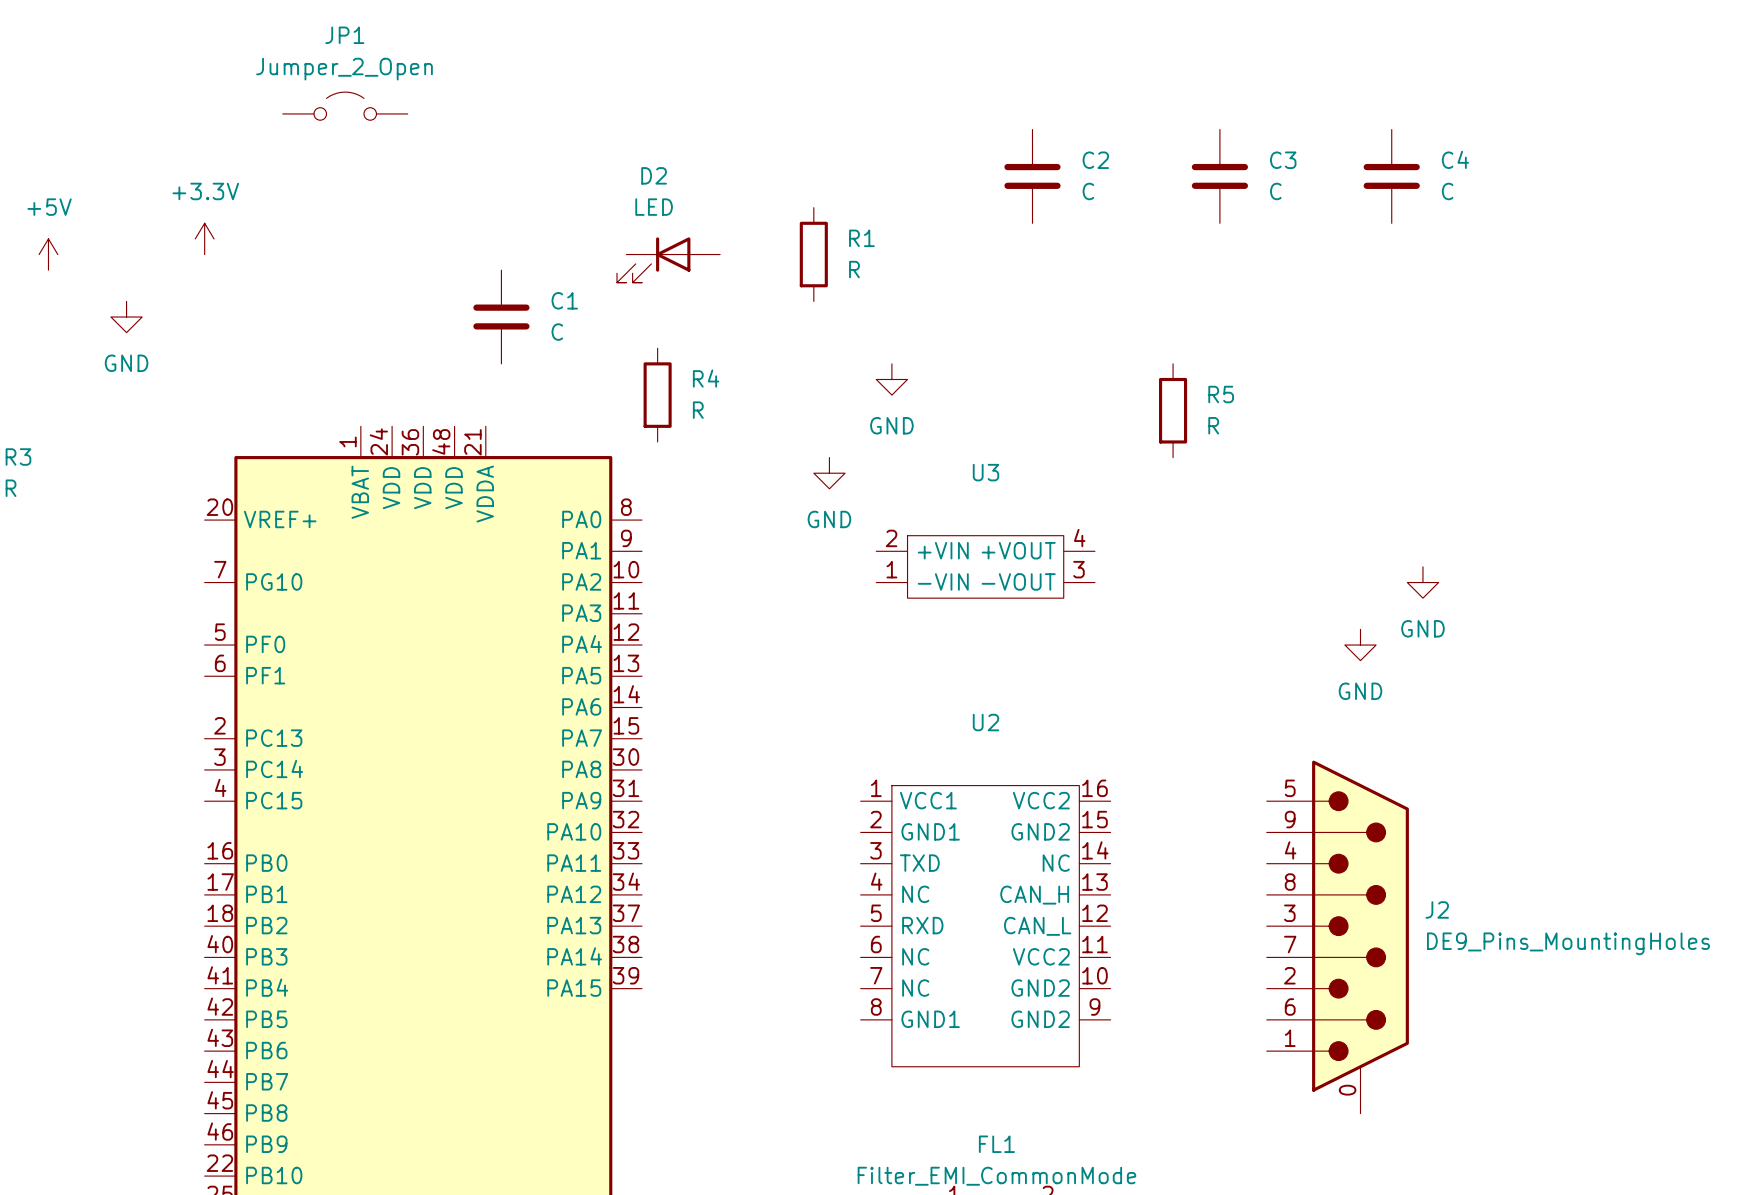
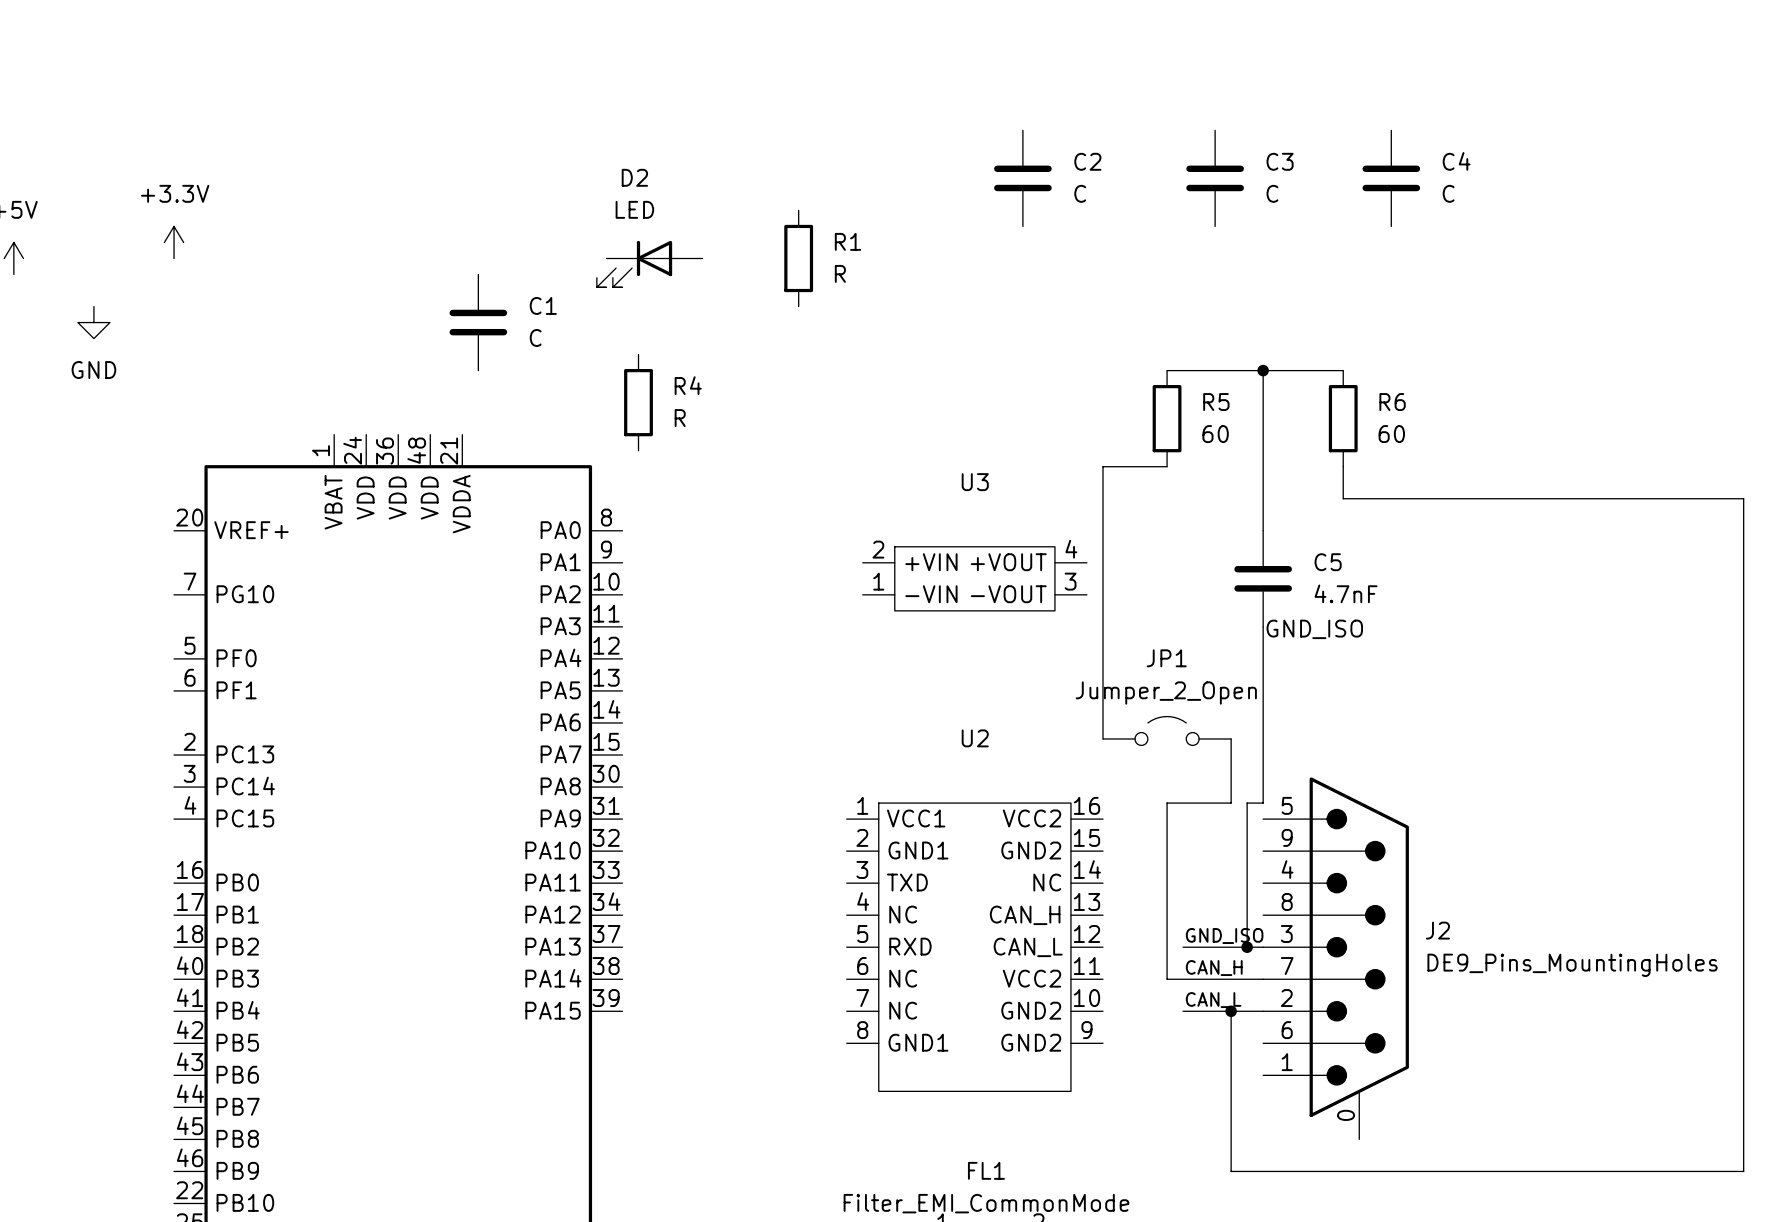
JP1 position: (345, 106) -> (1167, 730)
wire: none -> (1167, 370) (1343, 370)
wire: none -> (1263, 370) (1263, 530)
junction: none -> (1263, 370)
power symbol: GND (891, 379) -> none
R6: none -> 60 (1343, 418)
R5 value: R (1213, 425) -> 60 (1215, 434)
wire: none -> (1167, 466) (1102, 466) (1102, 738)
wire: none -> (1343, 466) (1343, 498) (1743, 498) (1743, 1171) (1231, 1171) (1231, 1011)
power symbol: GND (829, 473) -> none
C5: none -> 4.7nF (1263, 578)
power symbol: GND (1422, 582) -> none
wire: none -> (1263, 626) (1263, 803) (1247, 803) (1247, 947)
label: none -> GND_ISO (1314, 629)
power symbol: GND (1360, 645) -> none
wire: none -> (1231, 738) (1231, 803) (1167, 803) (1167, 979) (1263, 979)
label: none -> GND_ISO (1224, 936)
wire: none -> (1183, 947) (1263, 947)
junction: none -> (1247, 947)
label: none -> CAN_H (1214, 968)
label: none -> CAN_L (1213, 1000)
wire: none -> (1183, 1011) (1263, 1011)
junction: none -> (1231, 1011)

